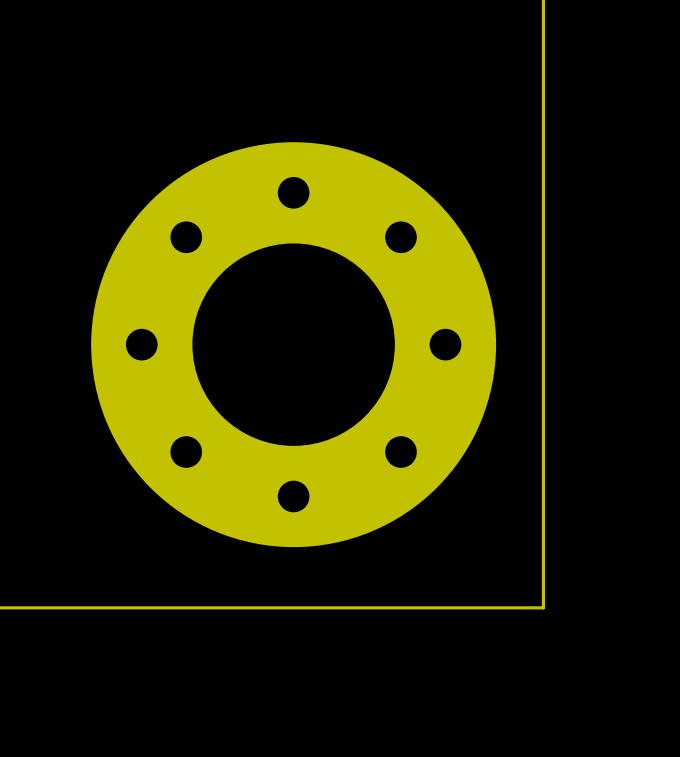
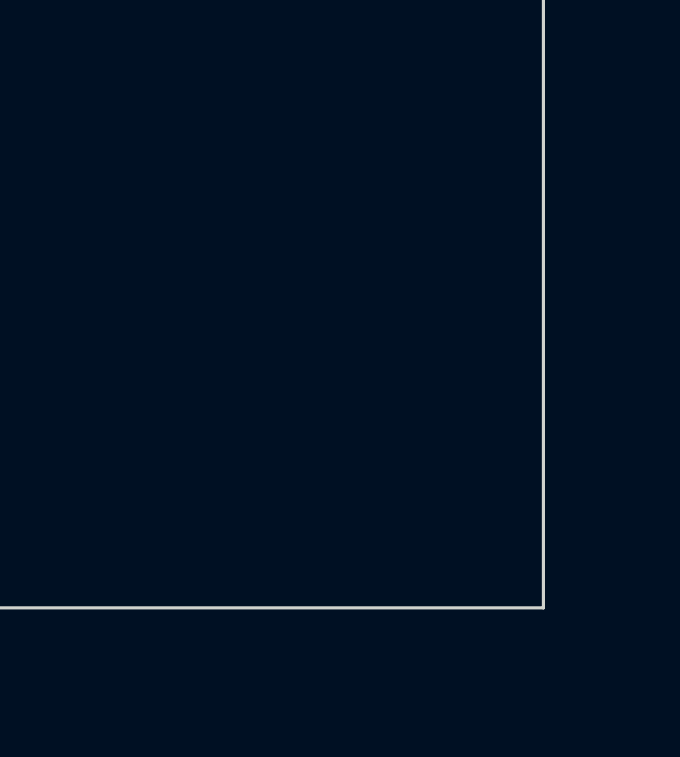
part: (293, 344) -> none

